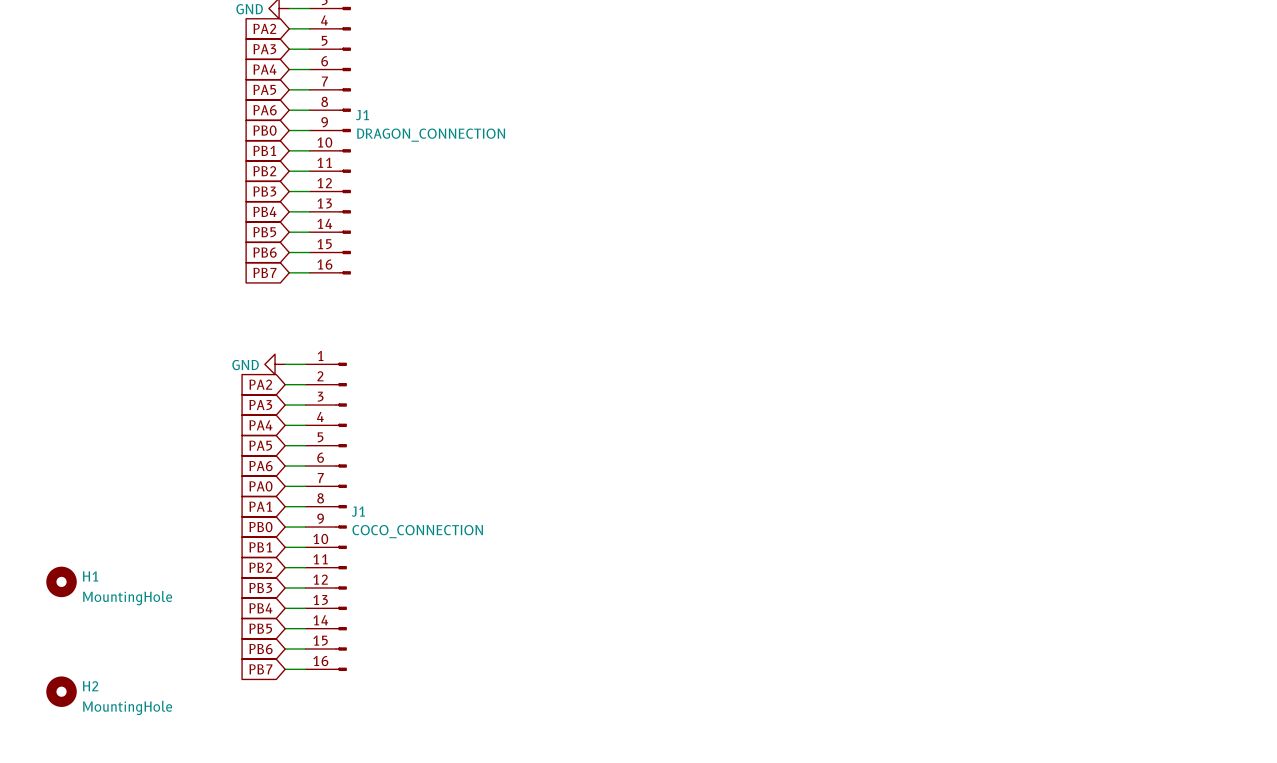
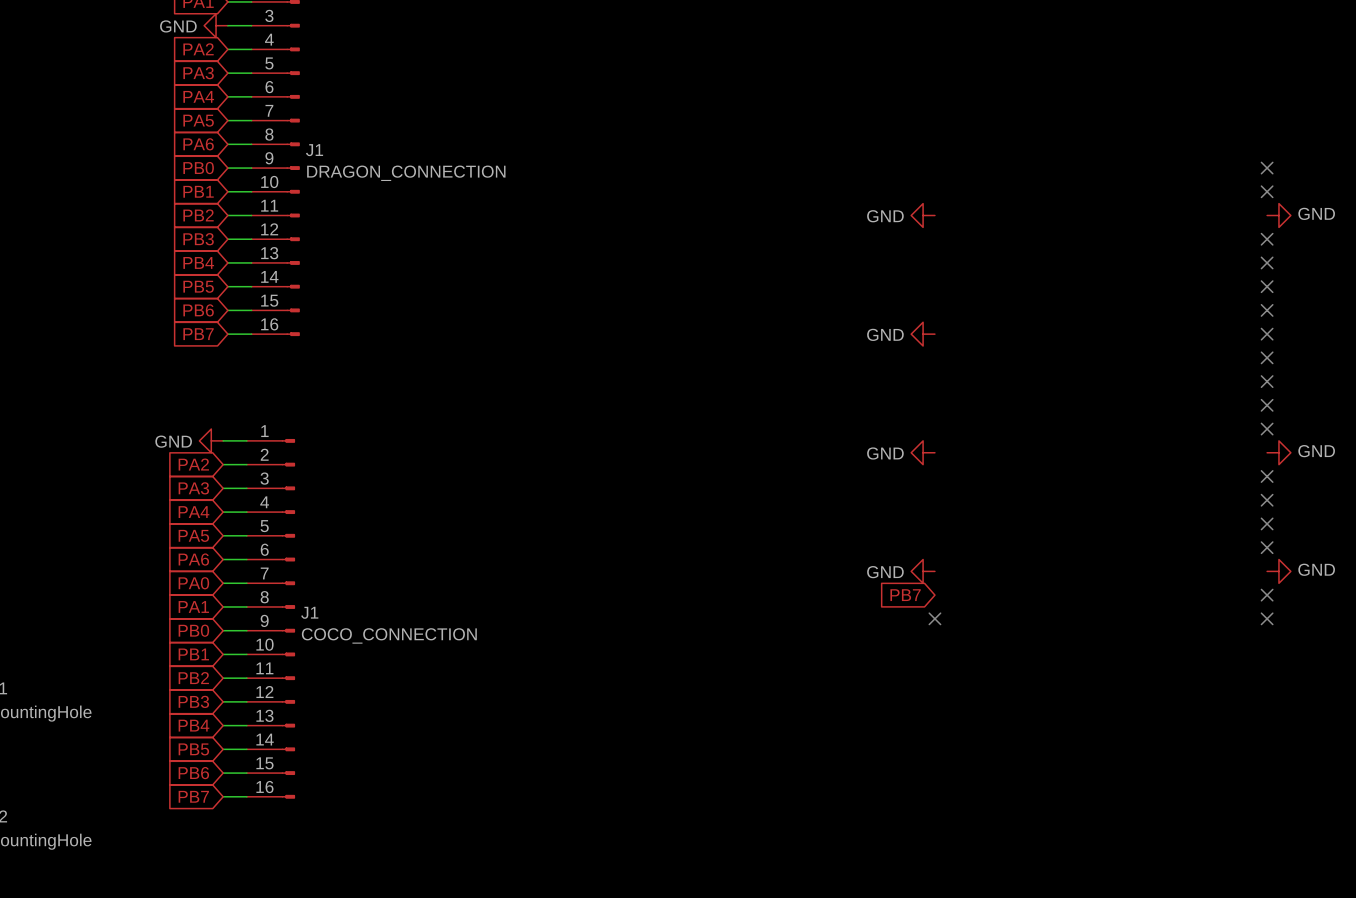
no-connect mark: none -> (1267, 168)
no-connect mark: none -> (1267, 191)
power symbol: none -> GND (923, 215)
power symbol: none -> GND (1278, 215)
no-connect mark: none -> (1267, 239)
no-connect mark: none -> (1267, 262)
no-connect mark: none -> (1267, 286)
no-connect mark: none -> (1267, 310)
power symbol: none -> GND (923, 334)
no-connect mark: none -> (1267, 334)
no-connect mark: none -> (1267, 357)
no-connect mark: none -> (1267, 381)
no-connect mark: none -> (1267, 405)
no-connect mark: none -> (1267, 429)
power symbol: none -> GND (923, 452)
power symbol: none -> GND (1278, 452)
no-connect mark: none -> (1267, 476)
no-connect mark: none -> (1267, 500)
no-connect mark: none -> (1267, 523)
no-connect mark: none -> (1267, 547)
power symbol: none -> GND (923, 571)
power symbol: none -> GND (1278, 571)
global label: none -> PB7 (905, 595)
no-connect mark: none -> (1267, 595)
no-connect mark: none -> (934, 618)
no-connect mark: none -> (1267, 618)

